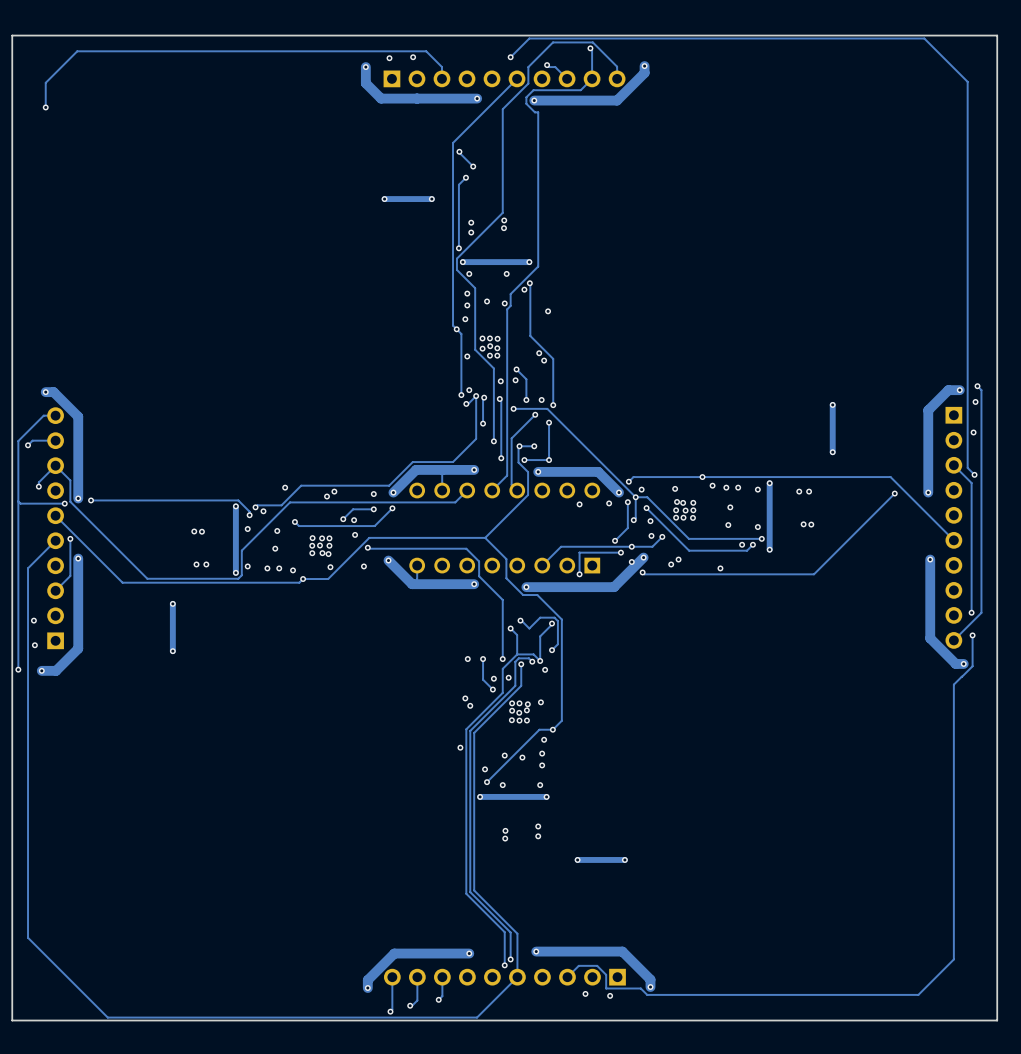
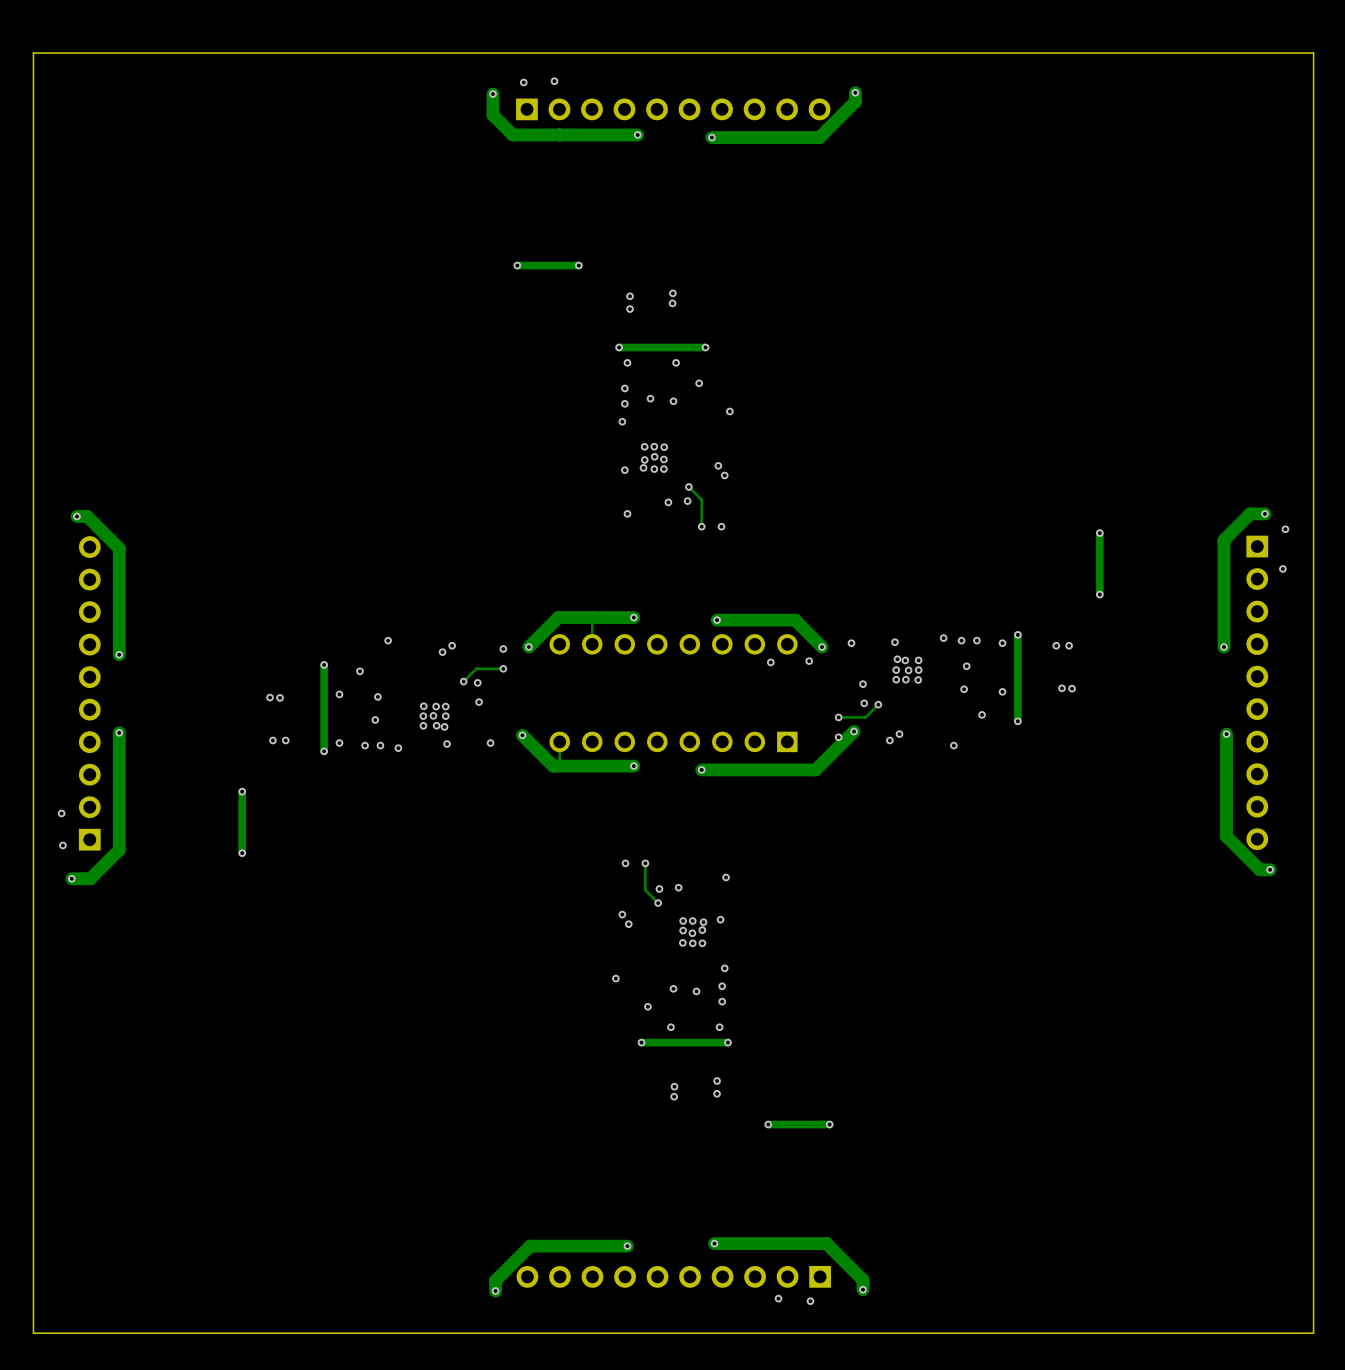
track: (590, 48) (592, 50) (592, 78) (580, 90) (533, 90) (526, 97) (526, 103) (534, 112) (538, 112) (538, 266) (510, 294) (510, 305) (507, 309) (507, 475) (492, 490) -> none
via: (590, 48) -> none
track: (510, 57) (529, 38) (924, 38) (967, 81) (967, 467) (974, 474) -> none
via: (510, 57) -> none
track: (547, 65) (555, 67) (567, 78) -> none
via: (547, 65) -> none
track: (441, 78) (441, 67) (426, 51) (77, 51) (45, 82) (45, 107) -> none
track: (517, 78) (453, 142) (453, 325) (461, 333) (461, 395) -> none
track: (617, 78) (617, 66) (592, 42) (552, 42) (528, 67) (528, 83) (502, 109) (502, 212) (456, 258) (456, 269) (475, 288) (475, 349) (493, 368) (493, 441) -> none
via: (45, 107) -> none
track: (459, 151) (473, 166) -> none
via: (459, 151) -> none
via: (473, 166) -> none
track: (465, 177) (458, 184) (458, 248) -> none
via: (465, 177) -> none
via: (458, 248) -> none
track: (529, 283) (530, 335) (553, 358) (553, 405) -> none
via: (529, 283) -> none
via: (456, 329) -> none
via: none -> (643, 467)
track: (977, 386) (981, 390) (981, 612) (953, 640) -> none
via: (977, 386) -> none
via: (461, 395) -> none
via: (476, 396) -> none
track: (484, 397) (483, 423) -> none
via: (484, 397) -> none
track: (499, 399) (501, 458) -> none
via: (499, 399) -> none
track: (466, 403) (476, 396) (476, 438) (453, 462) (412, 462) (389, 485) (301, 485) (281, 505) (257, 505) (255, 507) -> none
via: (466, 403) -> none
via: (553, 405) -> none
track: (513, 408) (547, 408) (635, 497) -> none
via: (513, 408) -> none
track: (535, 414) (511, 438) (511, 484) (517, 490) -> none
via: (535, 414) -> none
track: (55, 415) (43, 415) (18, 441) (18, 669) -> none
track: (549, 422) (549, 460) (524, 460) -> none
via: (549, 422) -> none
via: (483, 423) -> none
track: (55, 440) (32, 440) (28, 445) -> none
via: (493, 441) -> none
via: (28, 445) -> none
via: (519, 446) -> none
track: (534, 446) (518, 447) (518, 462) (528, 472) (528, 494) (485, 537) -> none
via: (534, 446) -> none
via: (501, 458) -> none
via: (524, 460) -> none
via: (549, 460) -> none
track: (953, 465) (971, 483) (971, 612) -> none
via: (974, 474) -> none
via: (702, 477) -> none
track: (628, 481) (633, 477) (890, 477) (953, 540) -> none
via: (628, 481) -> none
track: (38, 486) (38, 482) (55, 465) (70, 480) (70, 501) (147, 578) (238, 578) (241, 575) (241, 550) (290, 502) (455, 502) (467, 490) -> none
via: (38, 486) -> none
track: (894, 493) (814, 574) (644, 574) (642, 572) -> none
via: (894, 493) -> none
track: (635, 497) (635, 518) (633, 520) -> none
track: (635, 497) (647, 497) (688, 538) (761, 538) -> none
via: (635, 497) -> none
track: (91, 500) (238, 500) (249, 511) (249, 515) -> none
via: (91, 500) -> none
track: (18, 501) (20, 503) (64, 503) -> none
track: (627, 502) (627, 528) (615, 540) -> none
via: (627, 502) -> none
via: (64, 503) -> none
via: (255, 507) -> none
track: (392, 508) (374, 526) (299, 526) (294, 521) -> none
via: (392, 508) -> none
track: (646, 508) (689, 550) (747, 550) (752, 544) -> none
via: (646, 508) -> none
track: (55, 515) (122, 582) (299, 582) (303, 579) (328, 579) (369, 537) (485, 537) -> none
via: (249, 515) -> none
via: (633, 520) -> none
via: (294, 521) -> none
track: (485, 537) (506, 559) (506, 578) (523, 595) (537, 595) (561, 619) (561, 720) (552, 729) (539, 729) (487, 782) -> none
track: (70, 538) (70, 576) (55, 590) -> none
via: (70, 538) -> none
via: (761, 538) -> none
track: (55, 540) (28, 568) (28, 937) (107, 1017) (477, 1017) (517, 977) (517, 933) (474, 890) (474, 732) (521, 685) (521, 664) -> none
via: (615, 540) -> none
via: (752, 544) -> none
track: (631, 546) (561, 546) (542, 565) -> none
track: (367, 547) (466, 548) (479, 561) (479, 576) (502, 599) (502, 659) -> none
via: (367, 547) -> none
track: (620, 552) (579, 552) (579, 574) -> none
via: (620, 552) -> none
via: (642, 572) -> none
via: (579, 574) -> none
via: (303, 579) -> none
via: (971, 612) -> none
track: (520, 620) (529, 628) (540, 617) (554, 617) (557, 621) (557, 644) (552, 650) -> none
via: (520, 620) -> none
track: (552, 623) (540, 636) (540, 661) (533, 654) (517, 654) -> none
via: (552, 623) -> none
track: (510, 628) (517, 635) (517, 654) -> none
via: (510, 628) -> none
track: (972, 635) (972, 666) (953, 684) (953, 959) (918, 994) (647, 994) (640, 988) (606, 988) (606, 974) (597, 965) (578, 965) (567, 977) -> none
via: (972, 635) -> none
via: (552, 650) -> none
track: (517, 654) (502, 668) (502, 692) (466, 729) (466, 893) (504, 932) (504, 965) -> none
via: (502, 659) -> none
track: (532, 661) (528, 658) (518, 658) (515, 661) (515, 685) (470, 730) (470, 892) (510, 932) (510, 959) -> none
via: (532, 661) -> none
via: (540, 661) -> none
via: (521, 664) -> none
via: (18, 669) -> none
via: (552, 729) -> none
via: (487, 782) -> none
via: (510, 959) -> none
via: (504, 965) -> none
track: (392, 977) (392, 1009) (390, 1011) -> none
track: (417, 977) (417, 1000) (410, 1005) -> none
track: (442, 977) (442, 996) (438, 999) -> none
via: (438, 999) -> none
via: (410, 1005) -> none
via: (390, 1011) -> none

